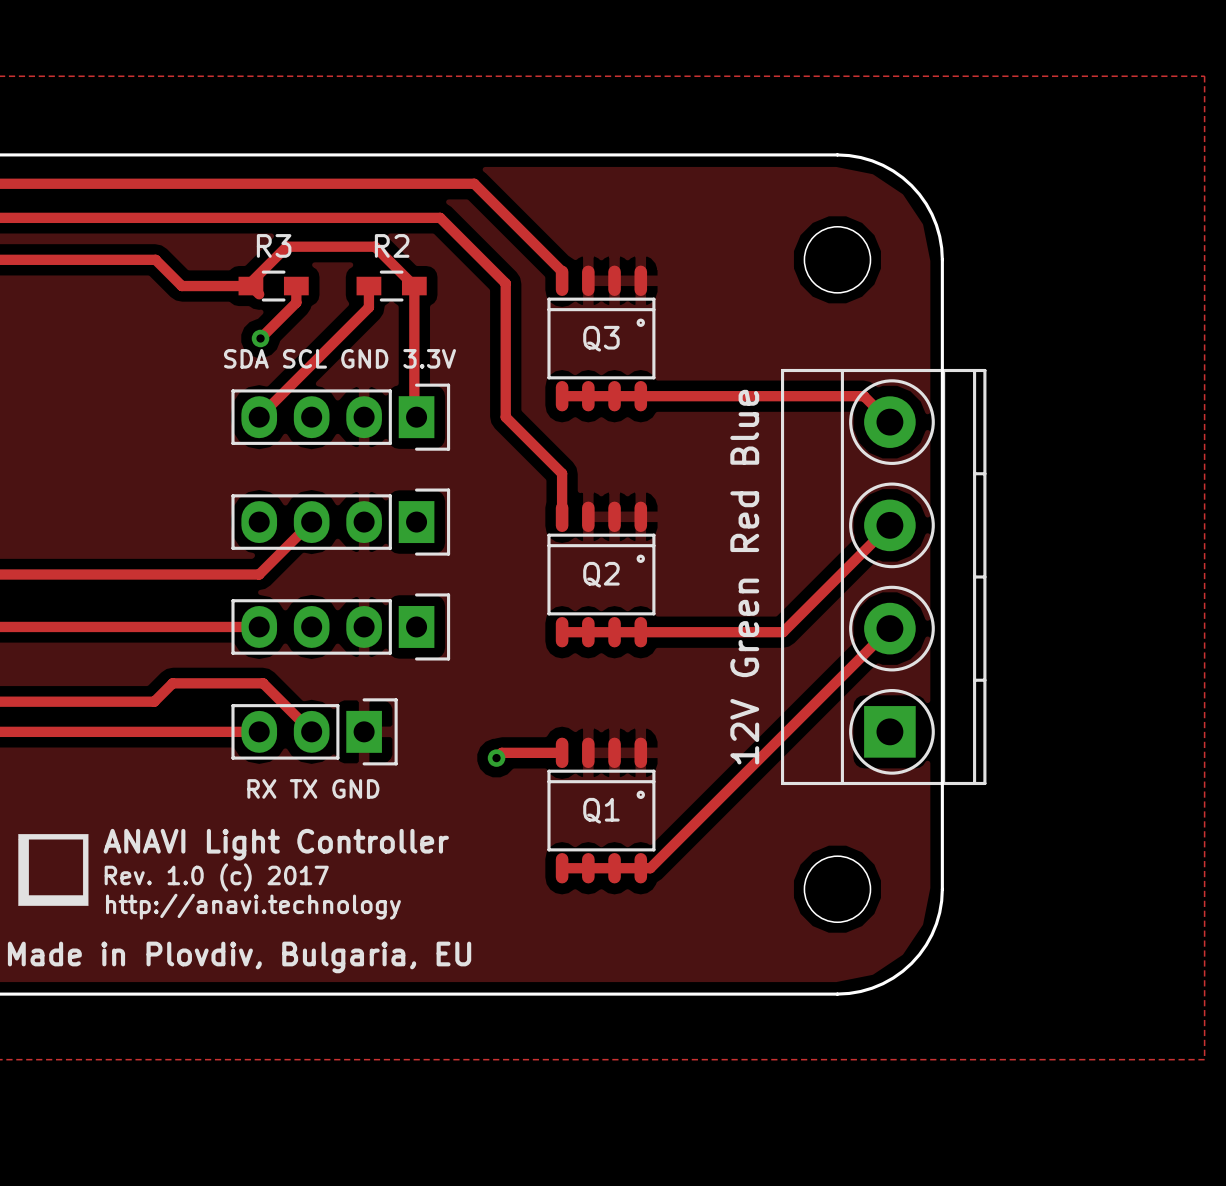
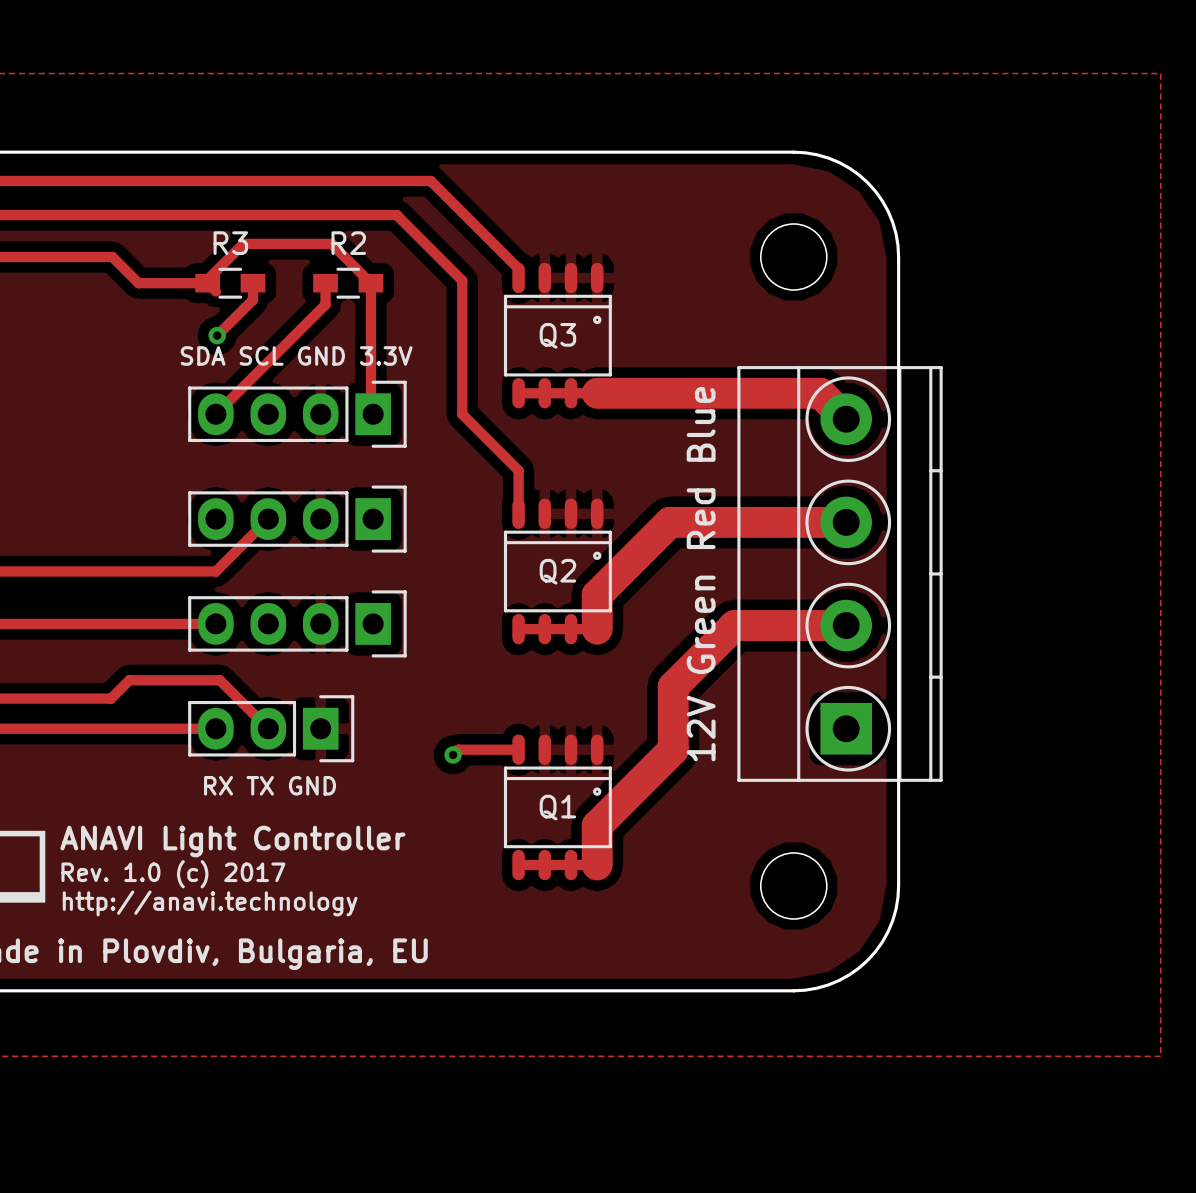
track width: thin (640, 396) (863, 396) (889, 422) -> thick (597, 393) (820, 393) (846, 419)
track: (889, 525) (783, 632) (640, 632) -> (846, 522) (669, 522) (597, 595) (597, 629) (597, 626)
track: (889, 628) (650, 868) (640, 868) -> (846, 625) (734, 625) (673, 686) (673, 749) (597, 825) (597, 865)

